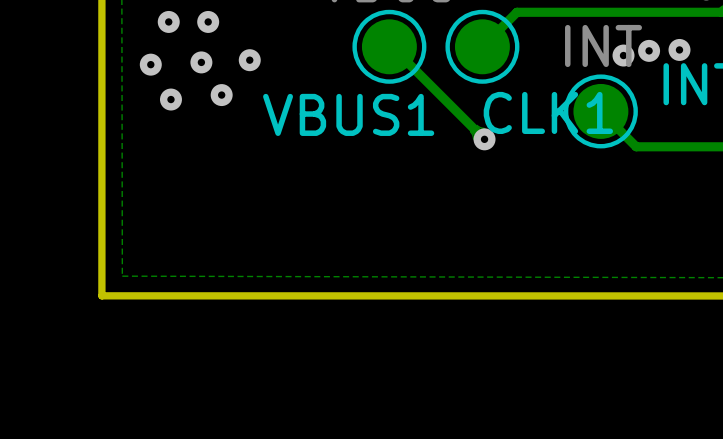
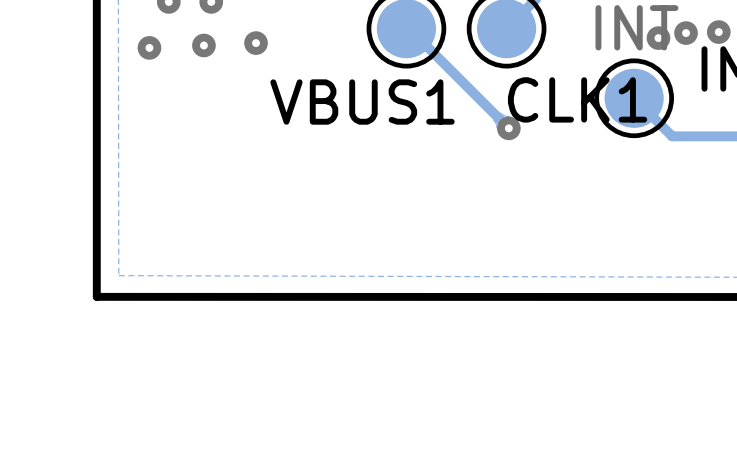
via: (221, 95) -> none
via: (170, 99) -> none

